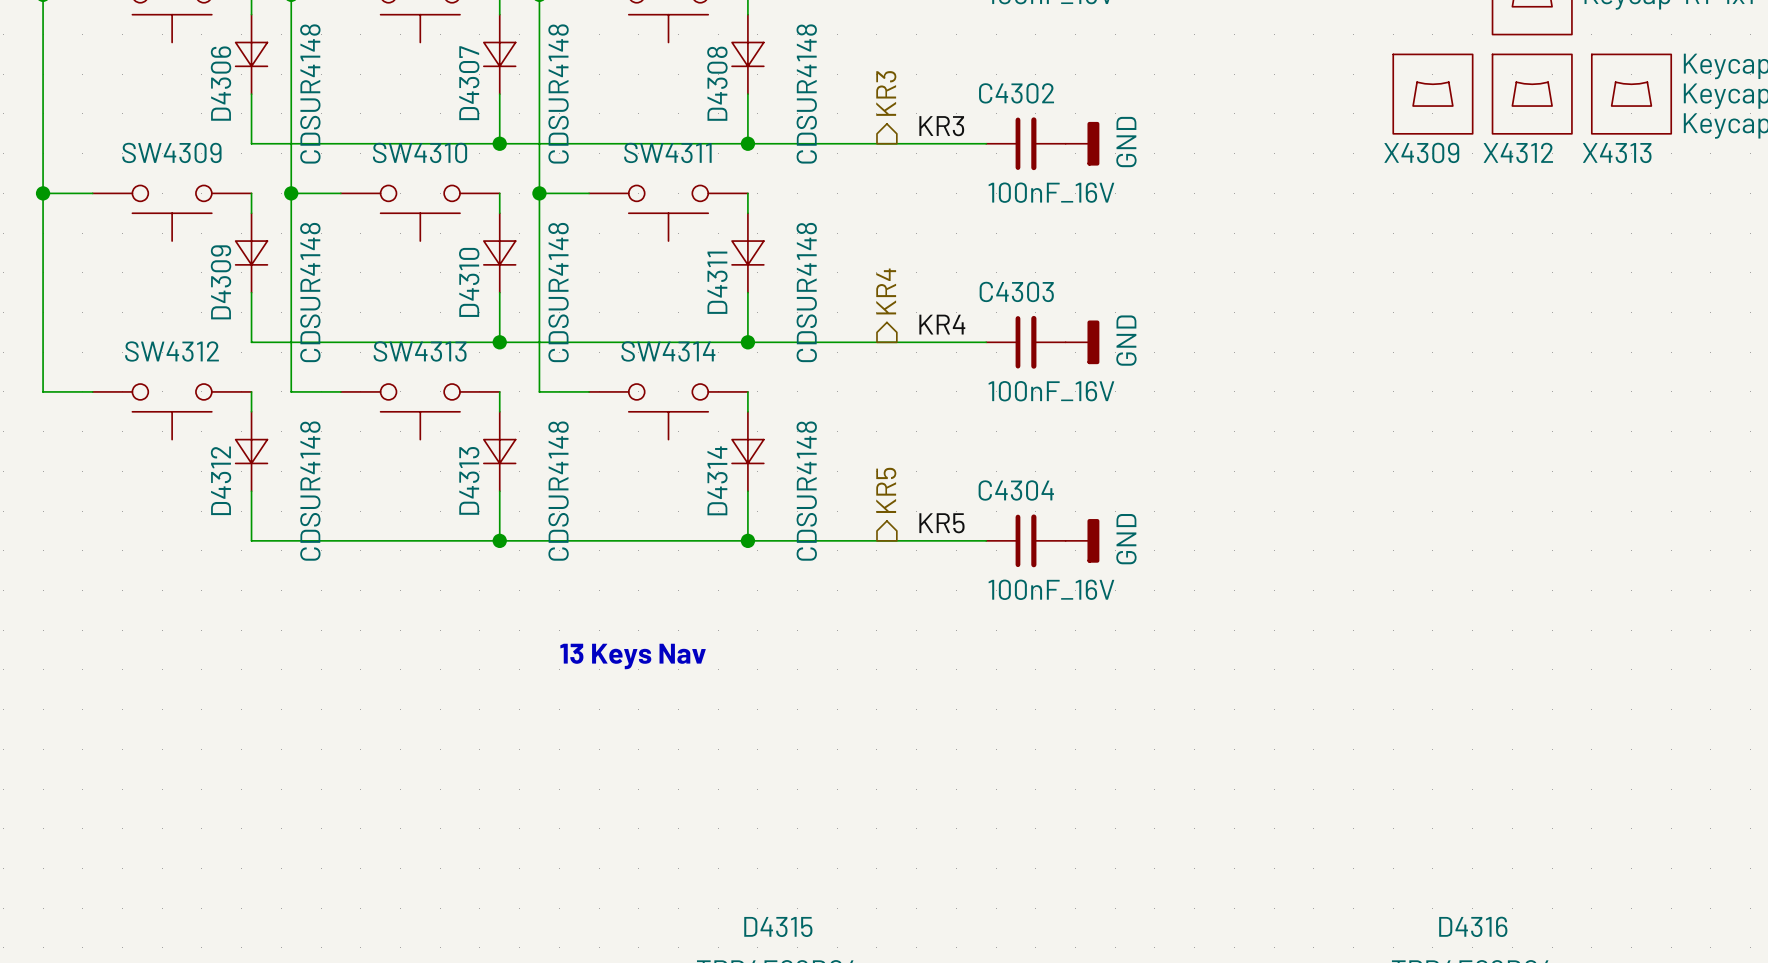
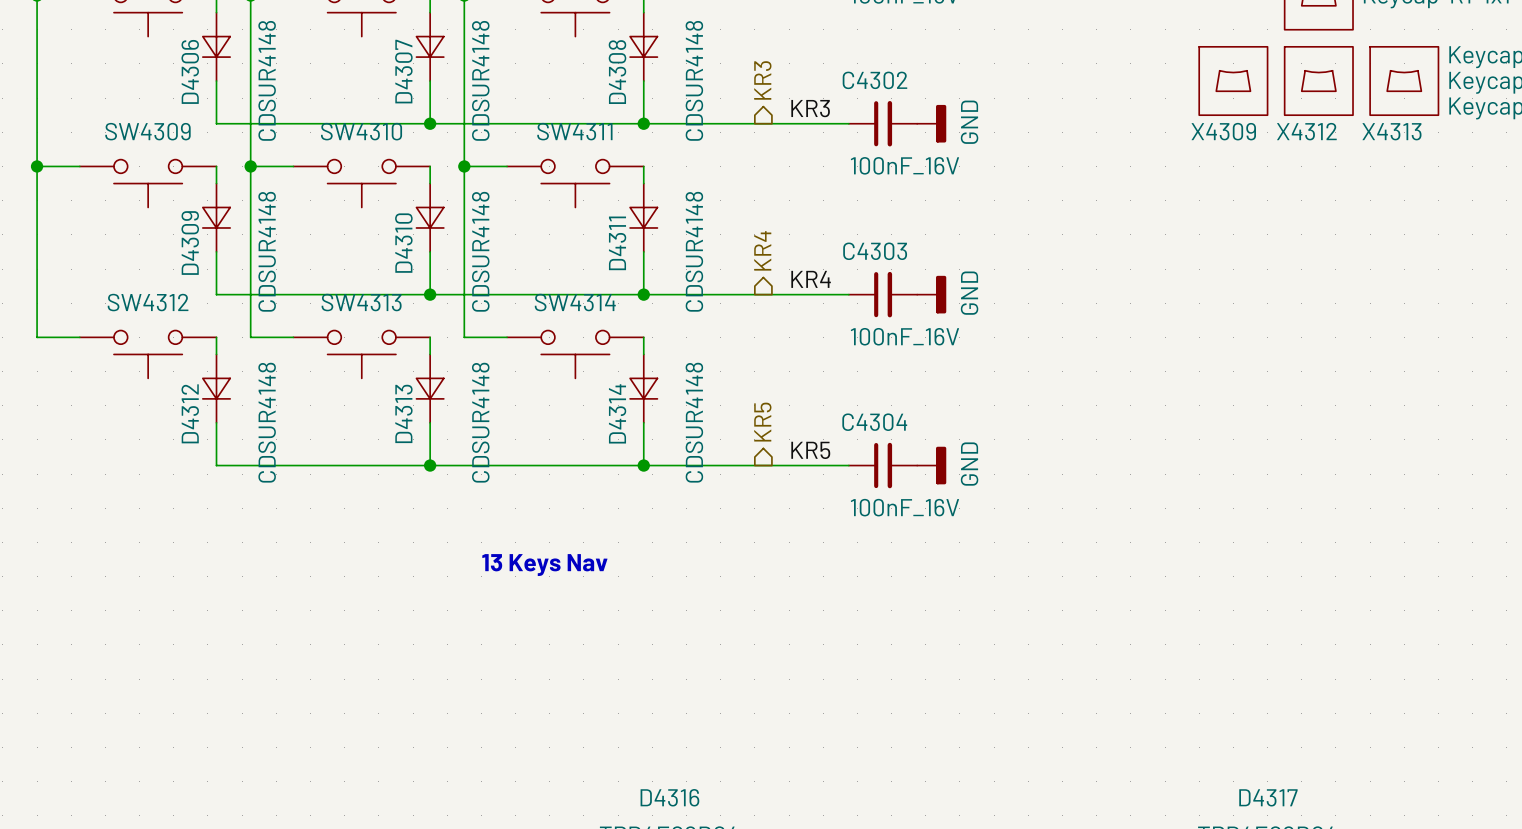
D4315 name: D4315 (778, 926) -> D4316 (669, 797)
D4316 name: D4316 (1473, 926) -> D4317 (1268, 797)

